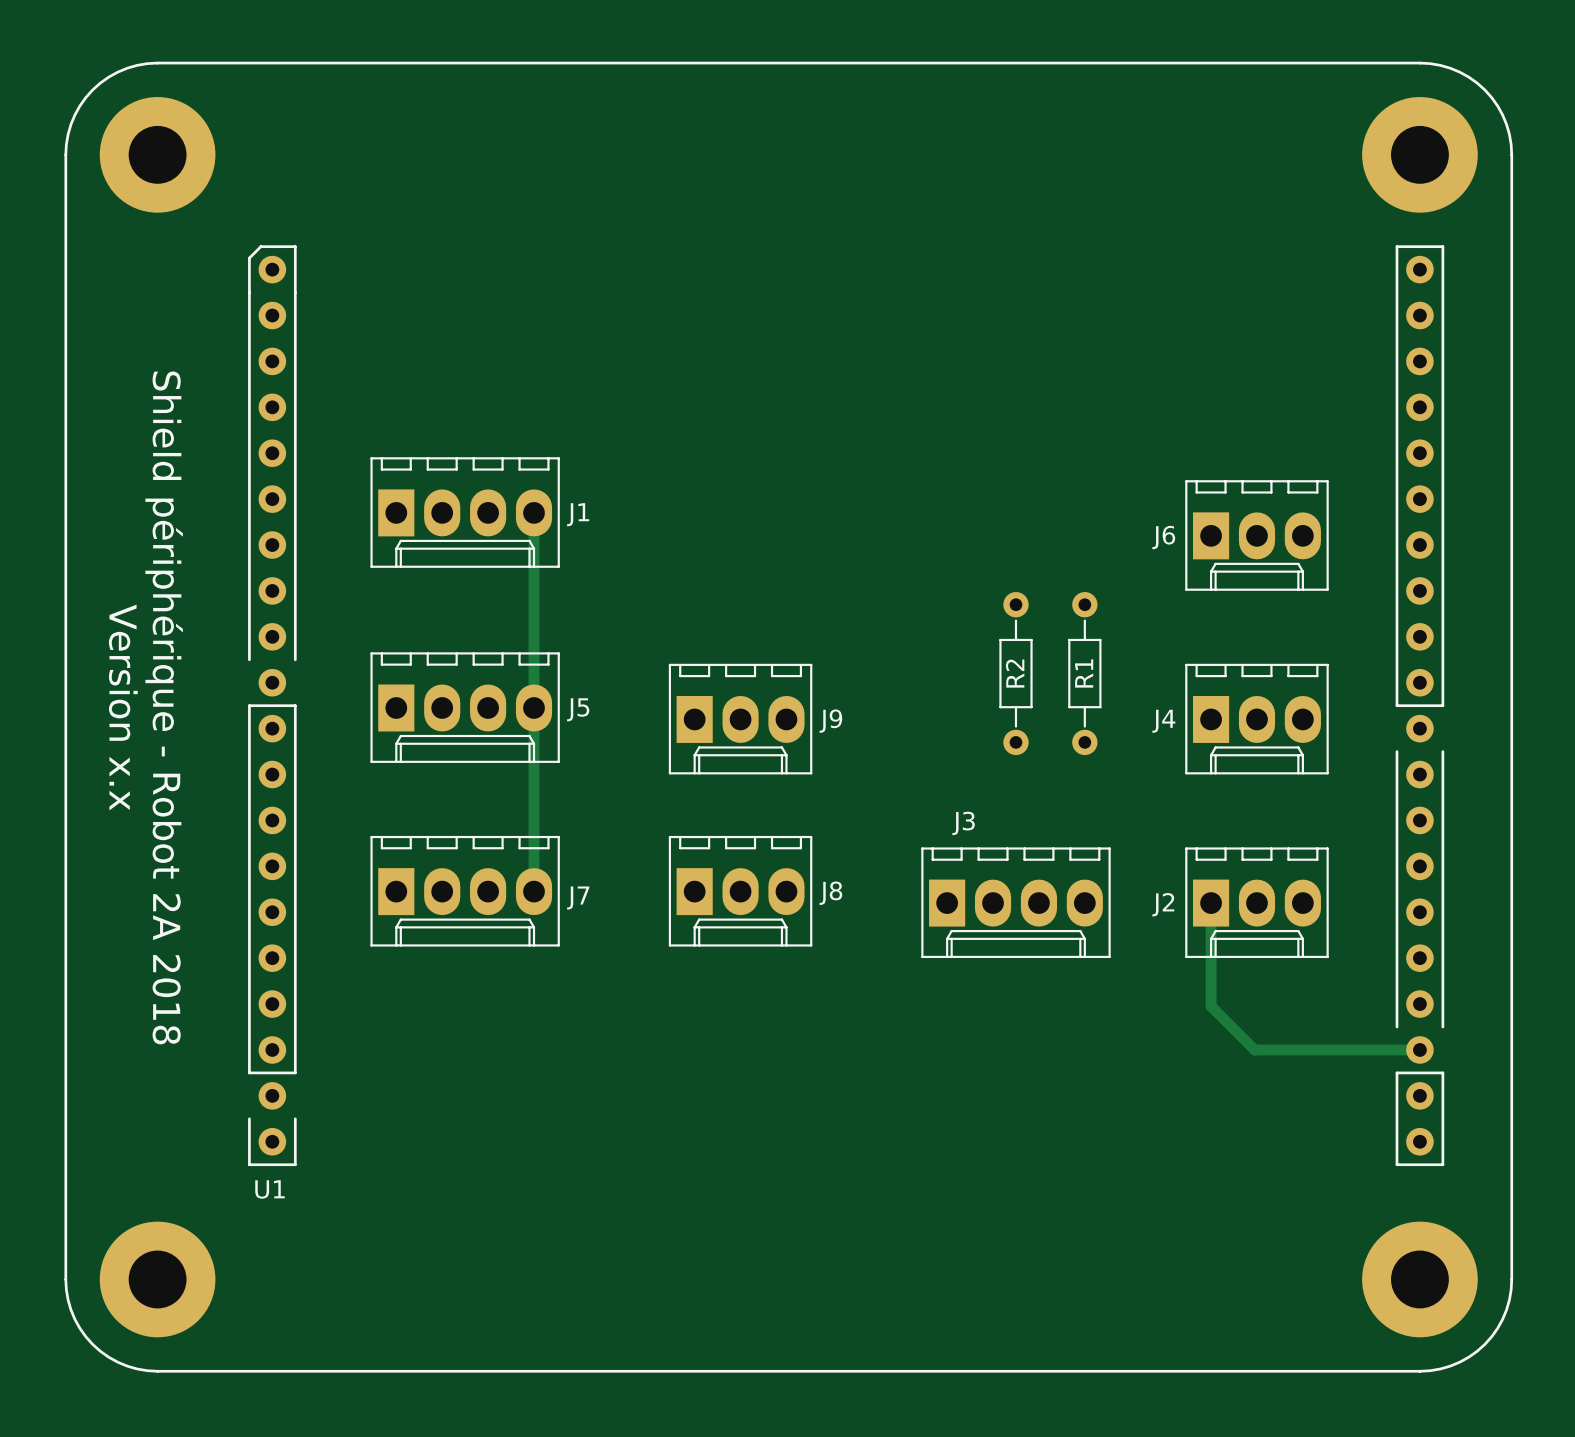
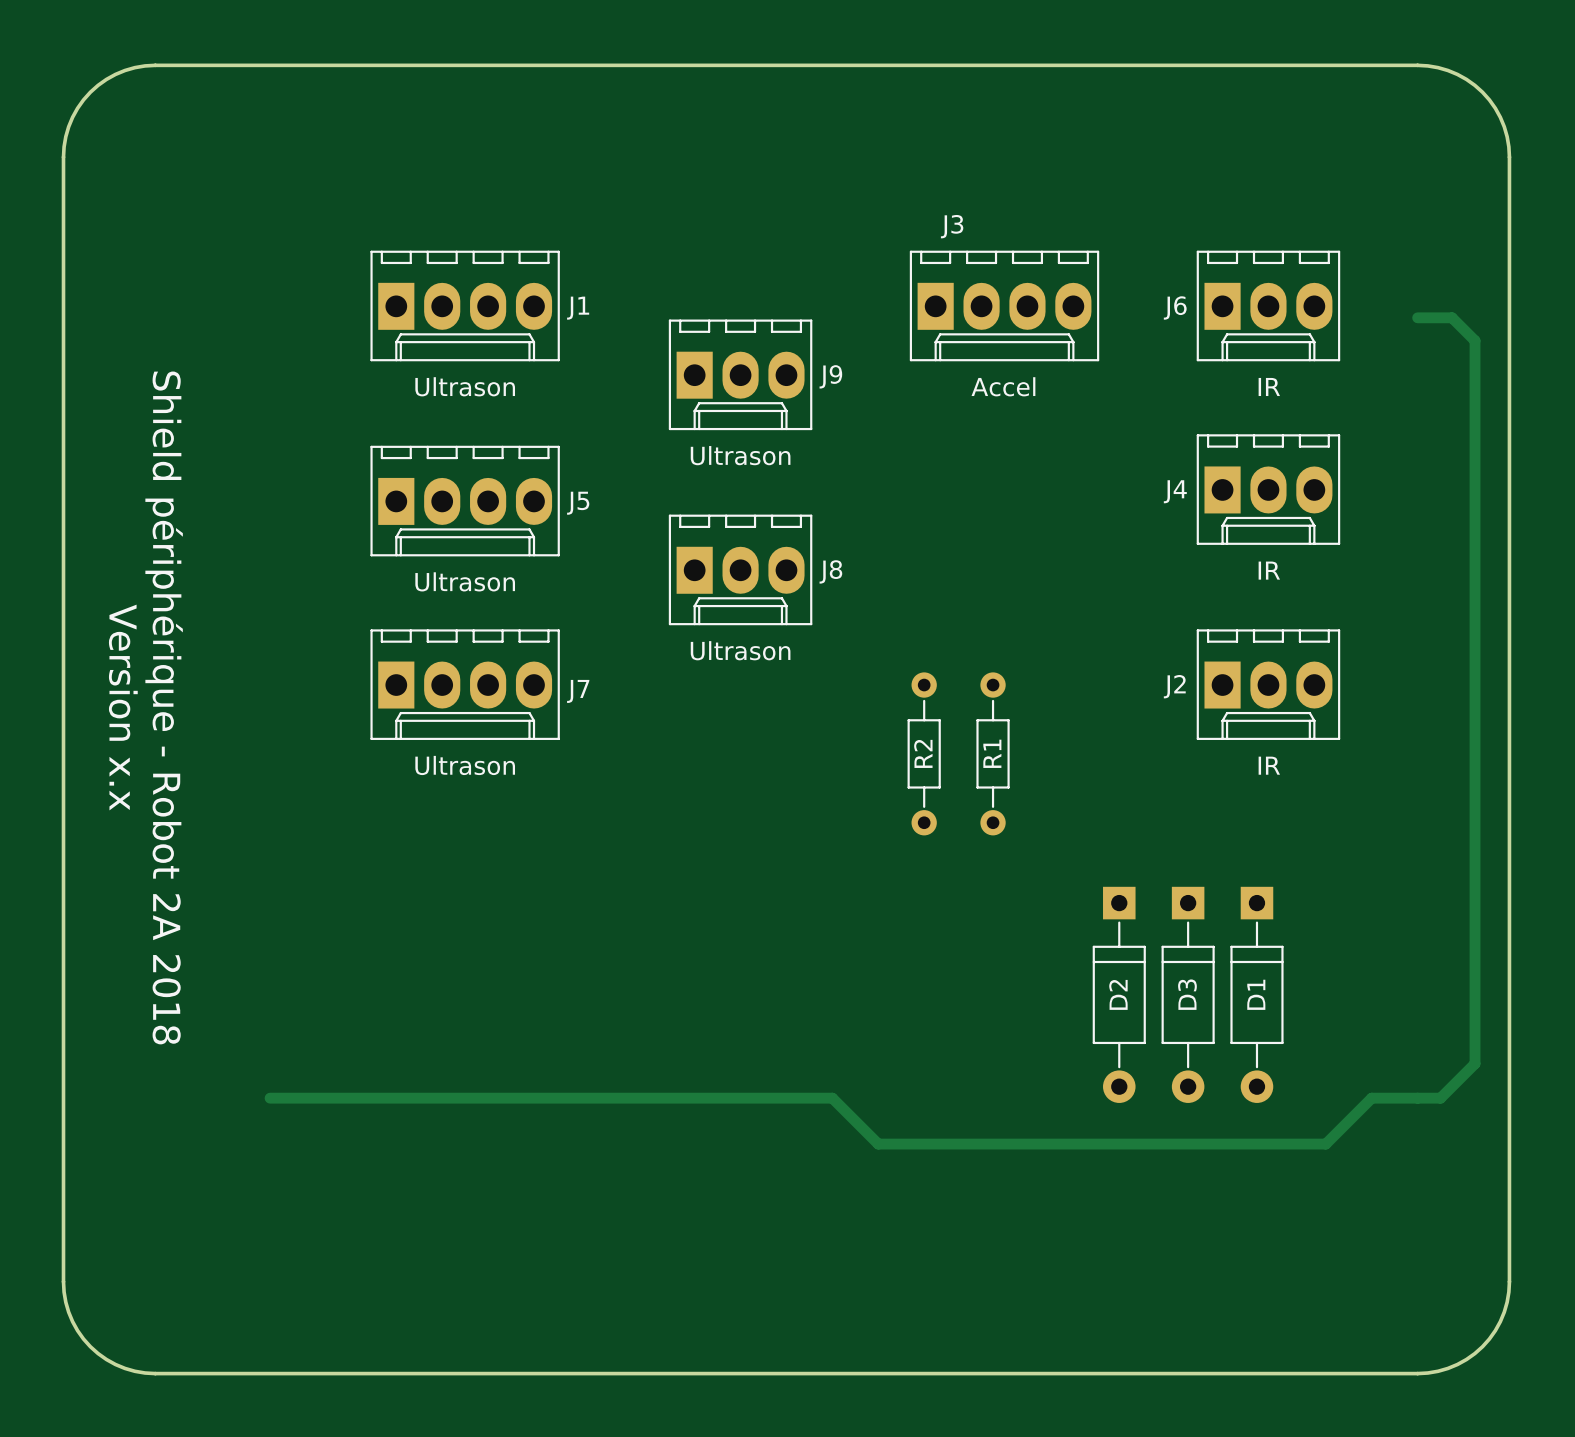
board edge: none -> (155, 65) (124, 70) (98, 85) (83, 99) (72, 117) (64, 146) (63, 1281)
board edge: none -> (155, 65) (1417, 65) (1438, 67) (1457, 74) (1482, 92) (1495, 108) (1504, 126) (1509, 157) (1508, 1292) (1500, 1321) (1482, 1346) (1457, 1364) (1427, 1373) (155, 1373) (124, 1368) (106, 1359) (90, 1346) (72, 1321) (65, 1302) (63, 1281)
track: none -> (1417, 317) (1452, 317) (1475, 340) (1475, 1063) (1440, 1098) (1371, 1098) (1325, 1144) (878, 1144) (832, 1098) (270, 1098)
J1 value: none -> Ultrason (465, 386)
J3 value: none -> Accel (1003, 386)
J6 value: none -> IR (1269, 386)
J9 value: none -> Ultrason (740, 455)
J1 position: (465, 512) -> (465, 305)
track: (534, 512) (534, 891) -> none
J6 position: (1256, 535) -> (1268, 305)
J4 value: none -> IR (1269, 570)
J5 value: none -> Ultrason (465, 581)
J8 value: none -> Ultrason (740, 650)
R2 position: (1015, 673) -> (924, 753)
R1 position: (1084, 673) -> (993, 753)
J5 position: (465, 707) -> (465, 501)
U1: (788, 717) -> none
J9 position: (740, 719) -> (740, 374)
J4 position: (1256, 719) -> (1268, 489)
J7 value: none -> Ultrason (465, 765)
J2 value: none -> IR (1269, 765)
J7 position: (465, 891) -> (465, 684)
J8 position: (740, 891) -> (740, 569)
J3 position: (1015, 902) -> (1004, 305)
J2 position: (1256, 902) -> (1268, 684)
track: (1211, 903) (1211, 1006) (1254, 1049) (1419, 1049) -> none
D2: none -> (1119, 994)
D3: none -> (1188, 994)
D1: none -> (1256, 994)

